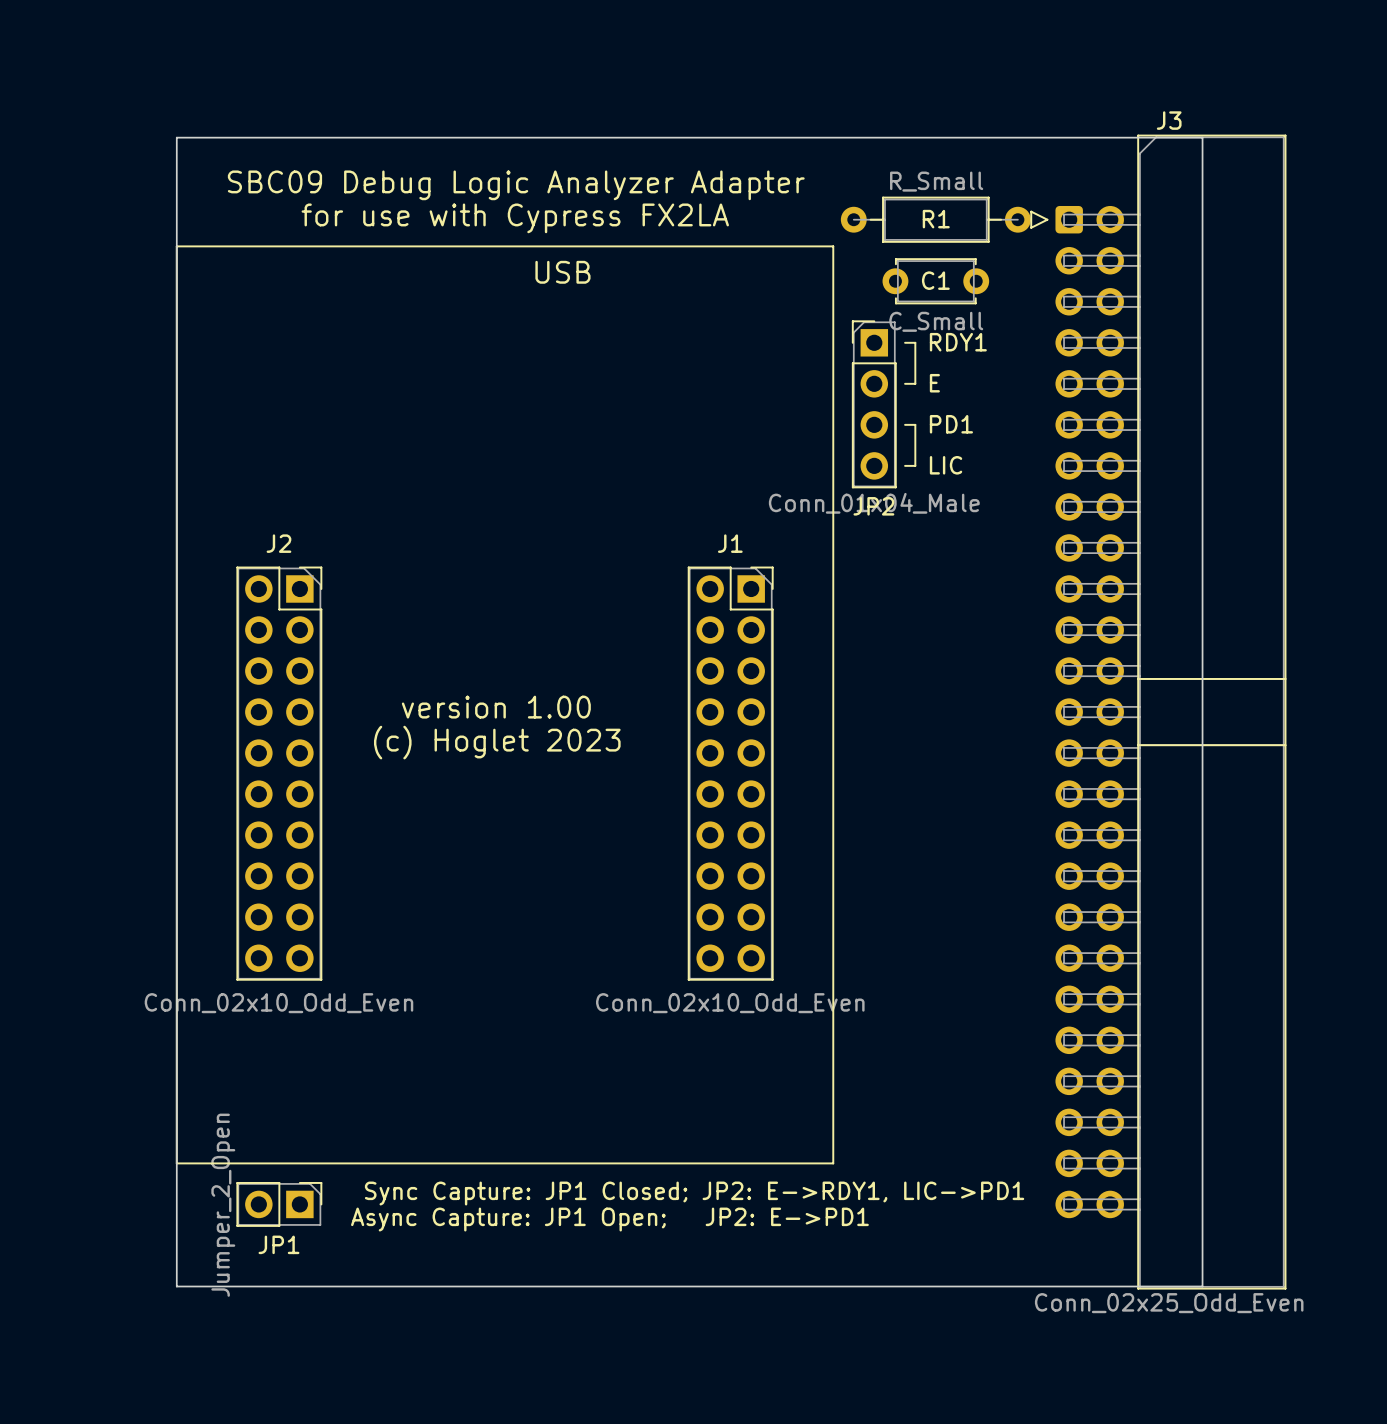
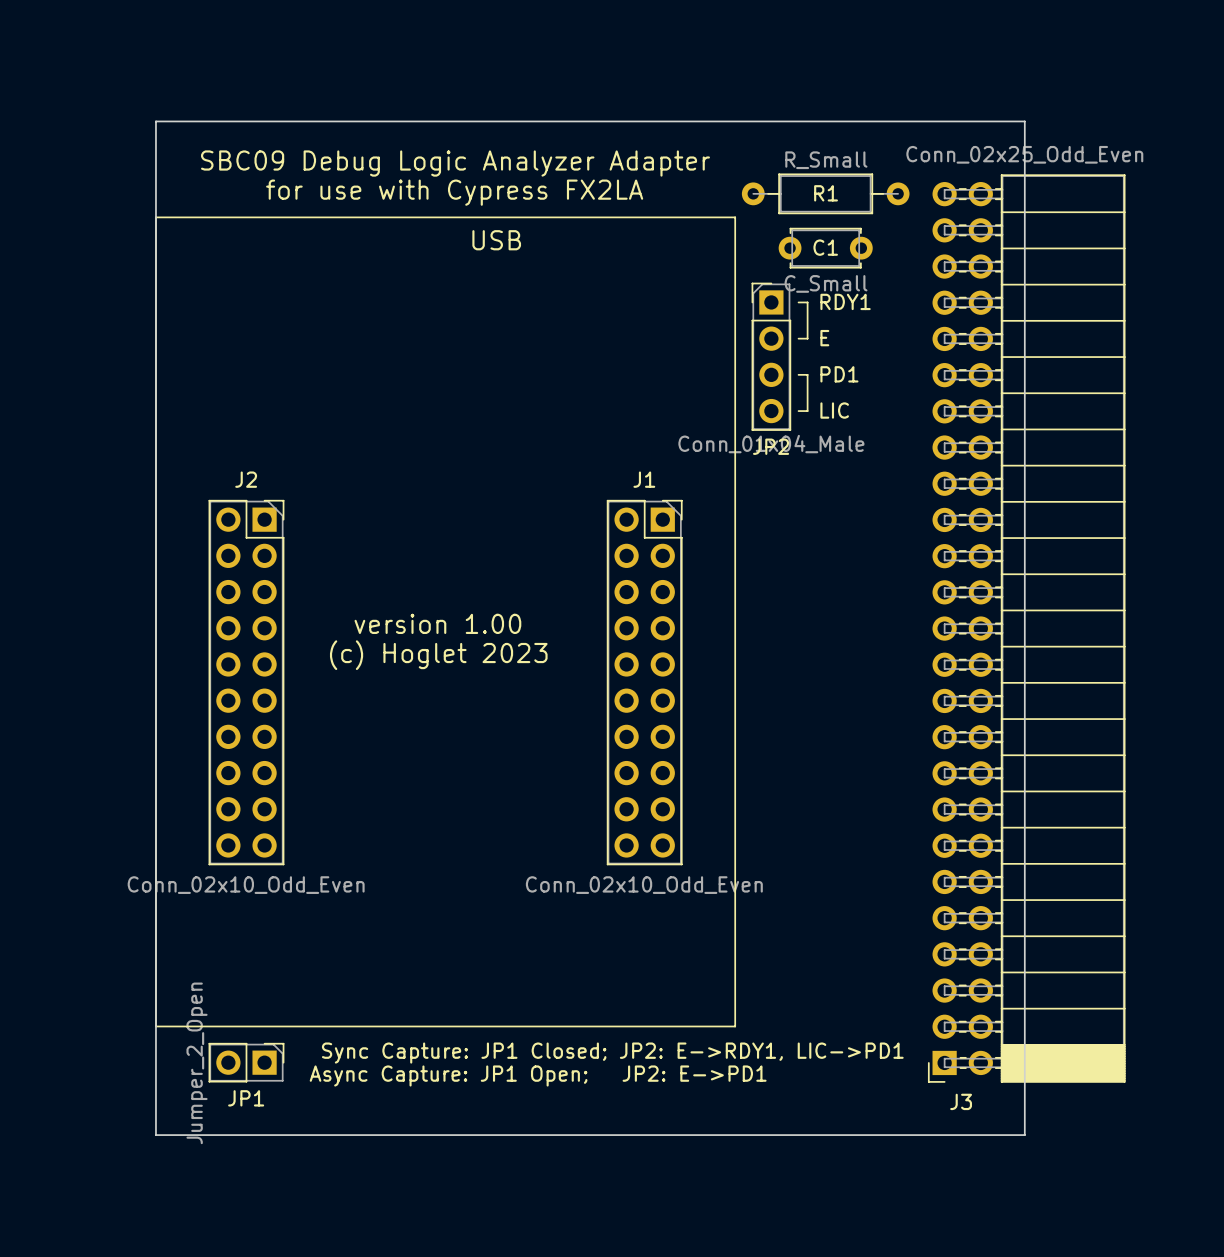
J3 name position: J3 (1169, 120) -> J3 (961, 1101)
J3 footprint: [1030, 134, 1287, 1290] -> [927, 174, 1126, 1083]
board edge: (1161, 137) (1202, 137) (1202, 1286) (1161, 1286) -> (1024, 121) (1024, 1135)
J3 value position: Conn_02x25_Odd_Even (1169, 1303) -> Conn_02x25_Odd_Even (1024, 154)

